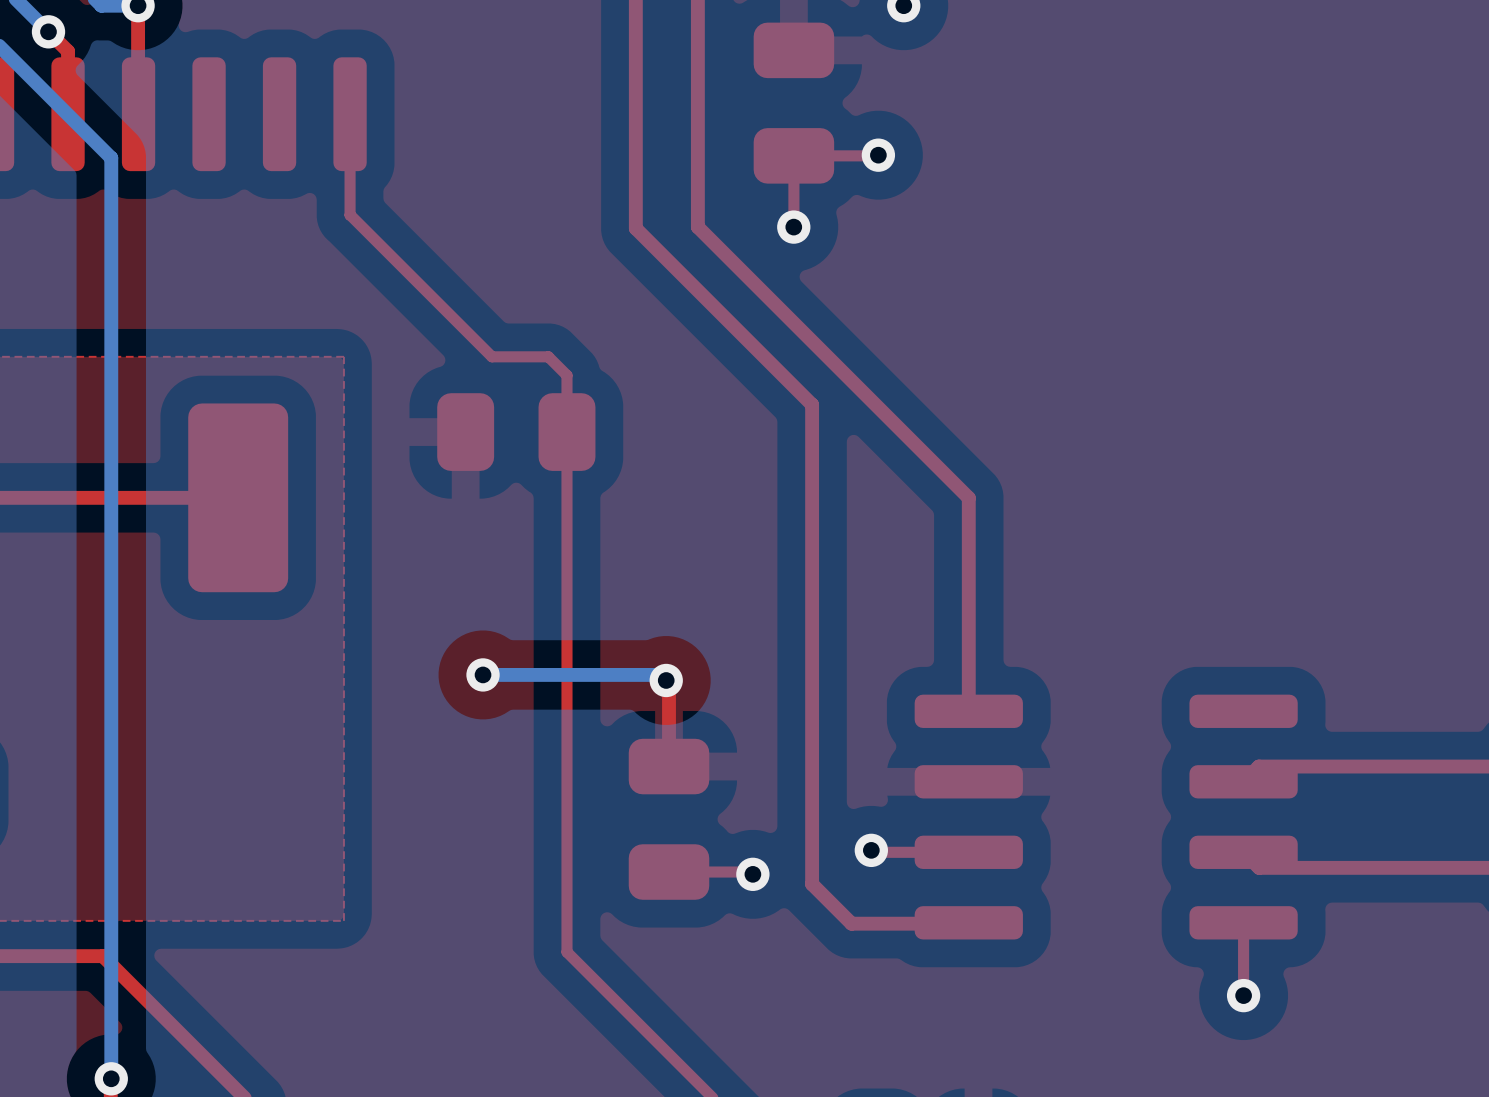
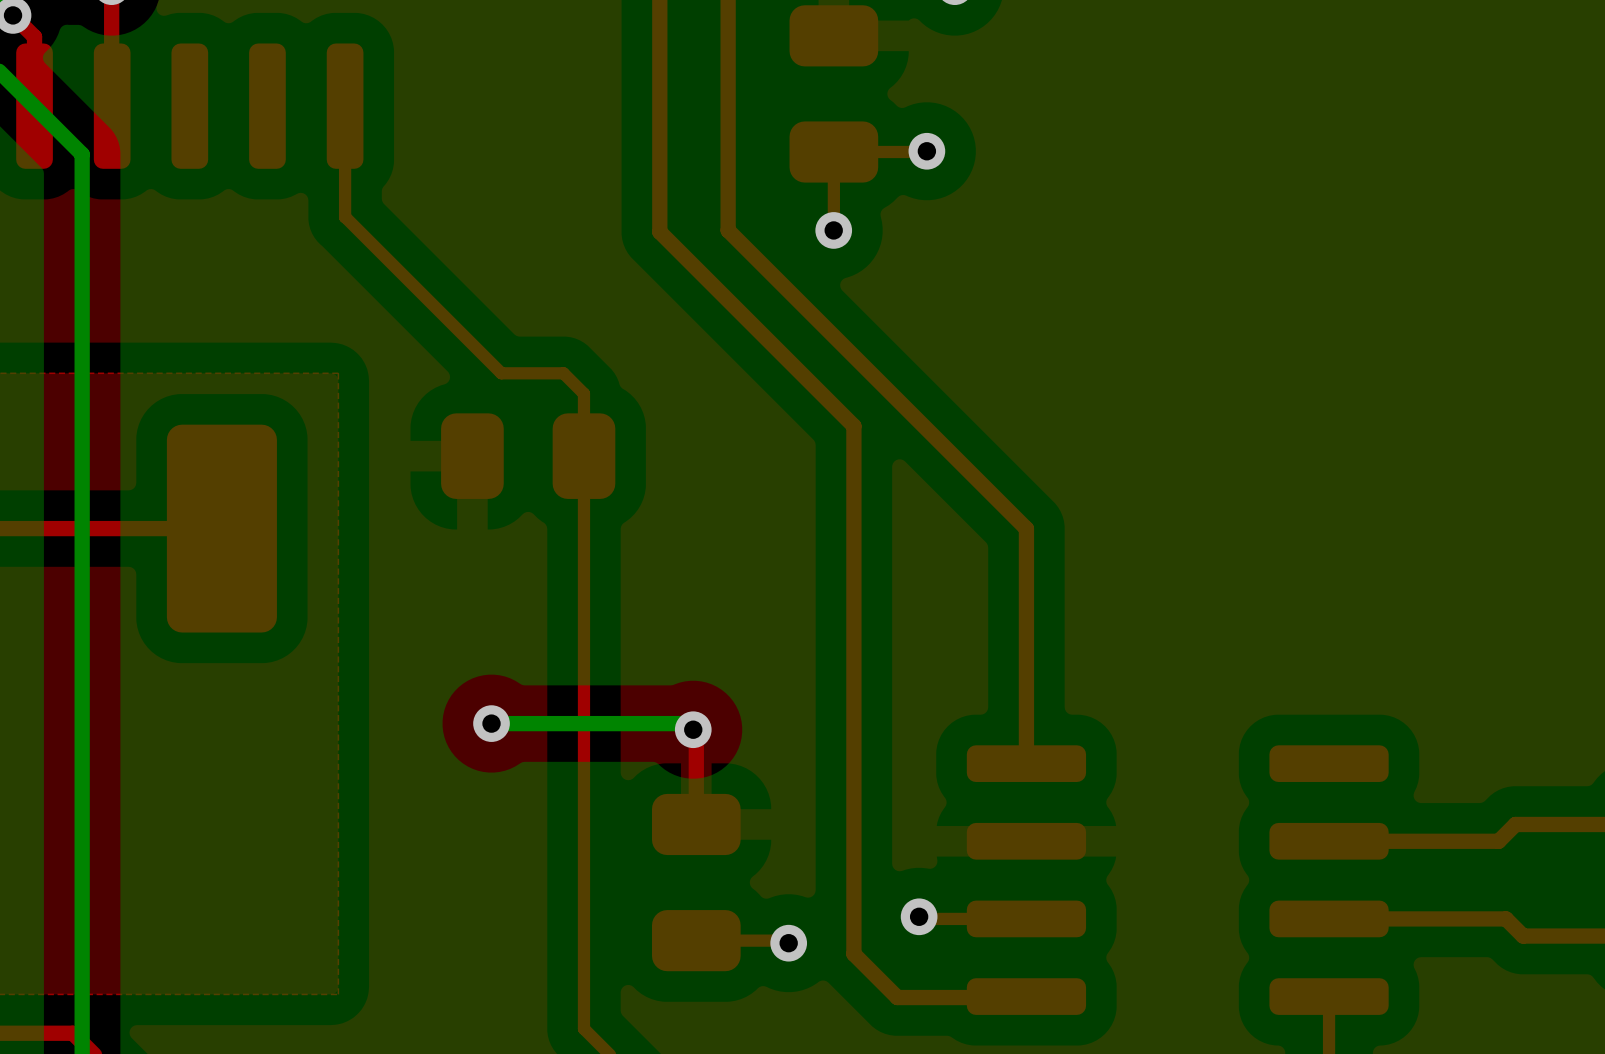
top track: (1412, 766) (1258, 766) (1243, 781) -> (1515, 824) (1498, 841) (1329, 841)
top track: (1243, 852) (1259, 867) (1419, 867) -> (1329, 918) (1506, 918) (1523, 936)

